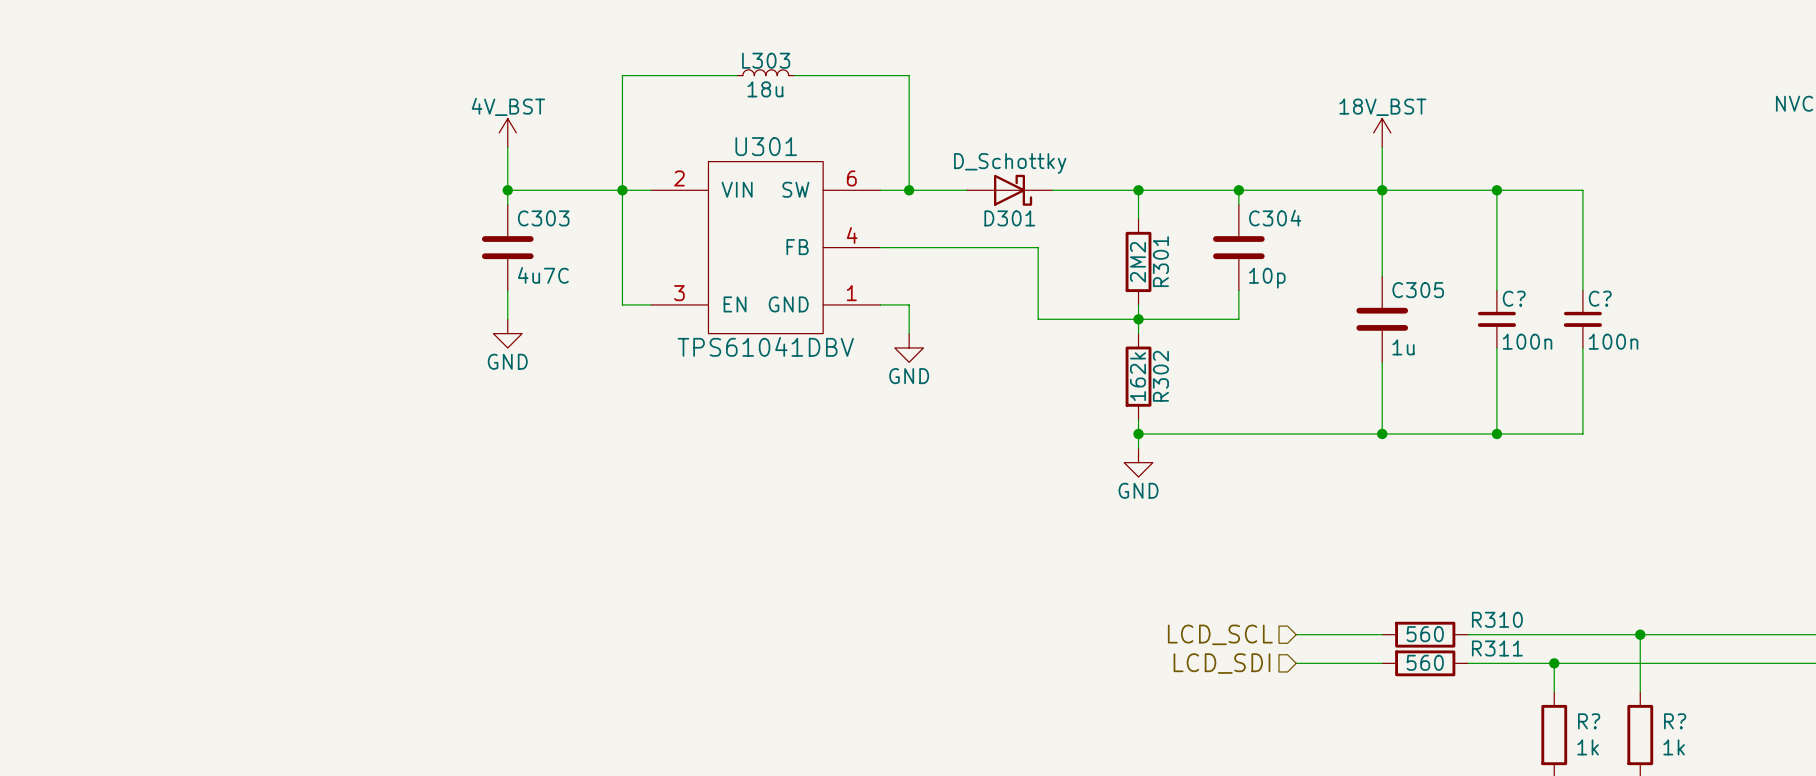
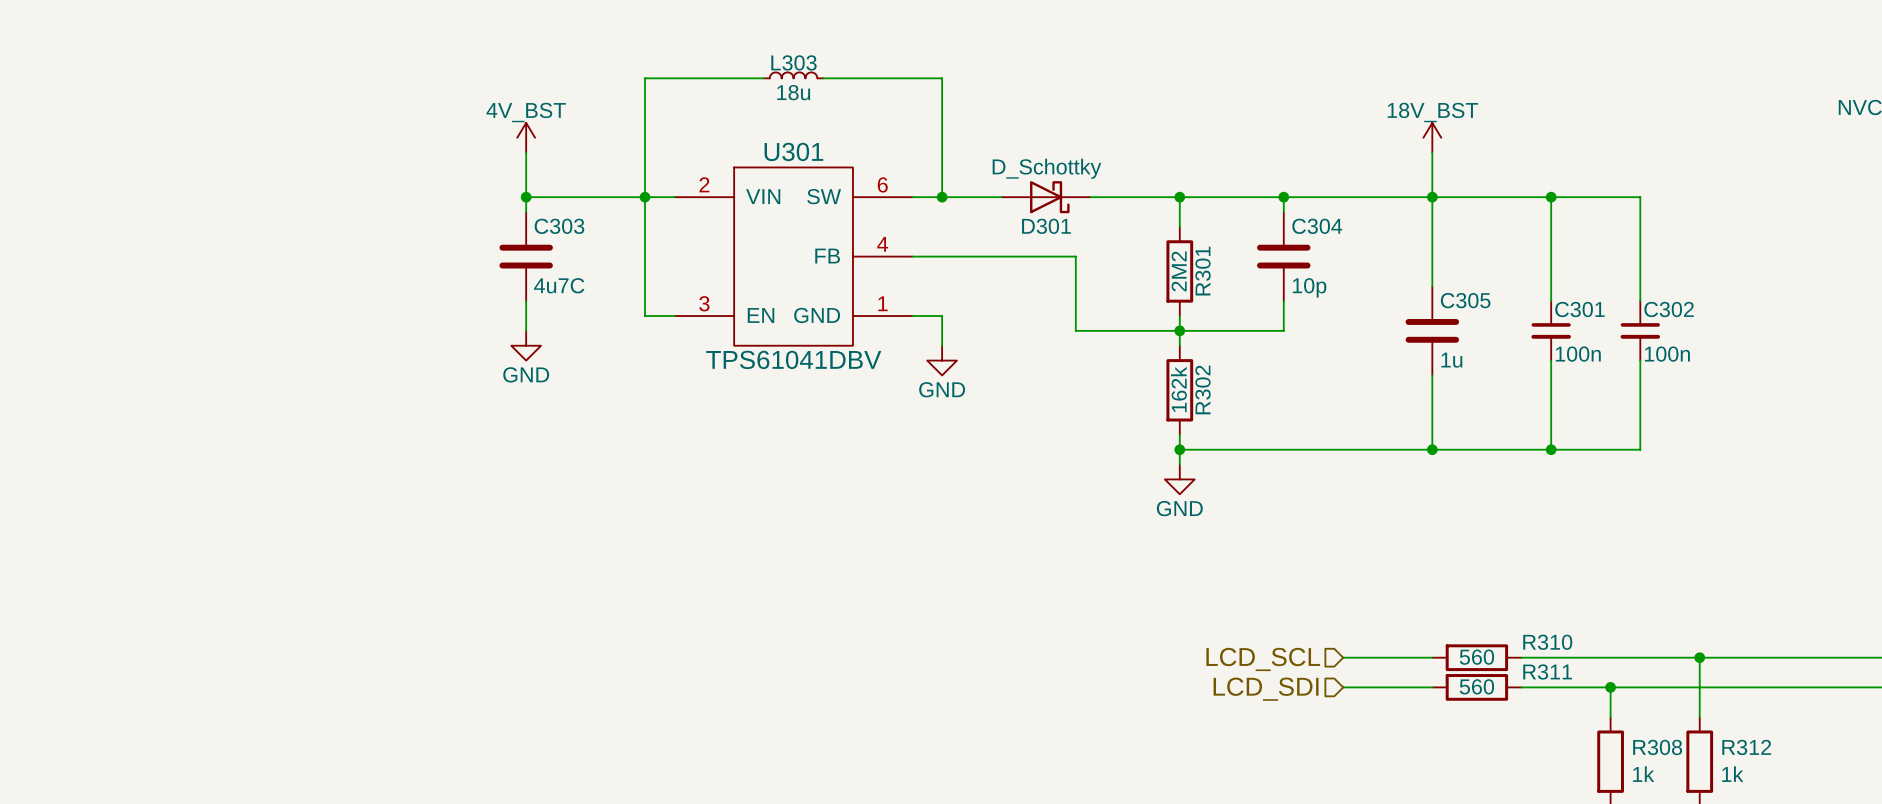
C? name: C? (1514, 298) -> C301 (1579, 309)
C? name: C? (1600, 298) -> C302 (1669, 309)
R? name: R? (1589, 721) -> R308 (1657, 747)
R? name: R? (1675, 721) -> R312 (1746, 747)

